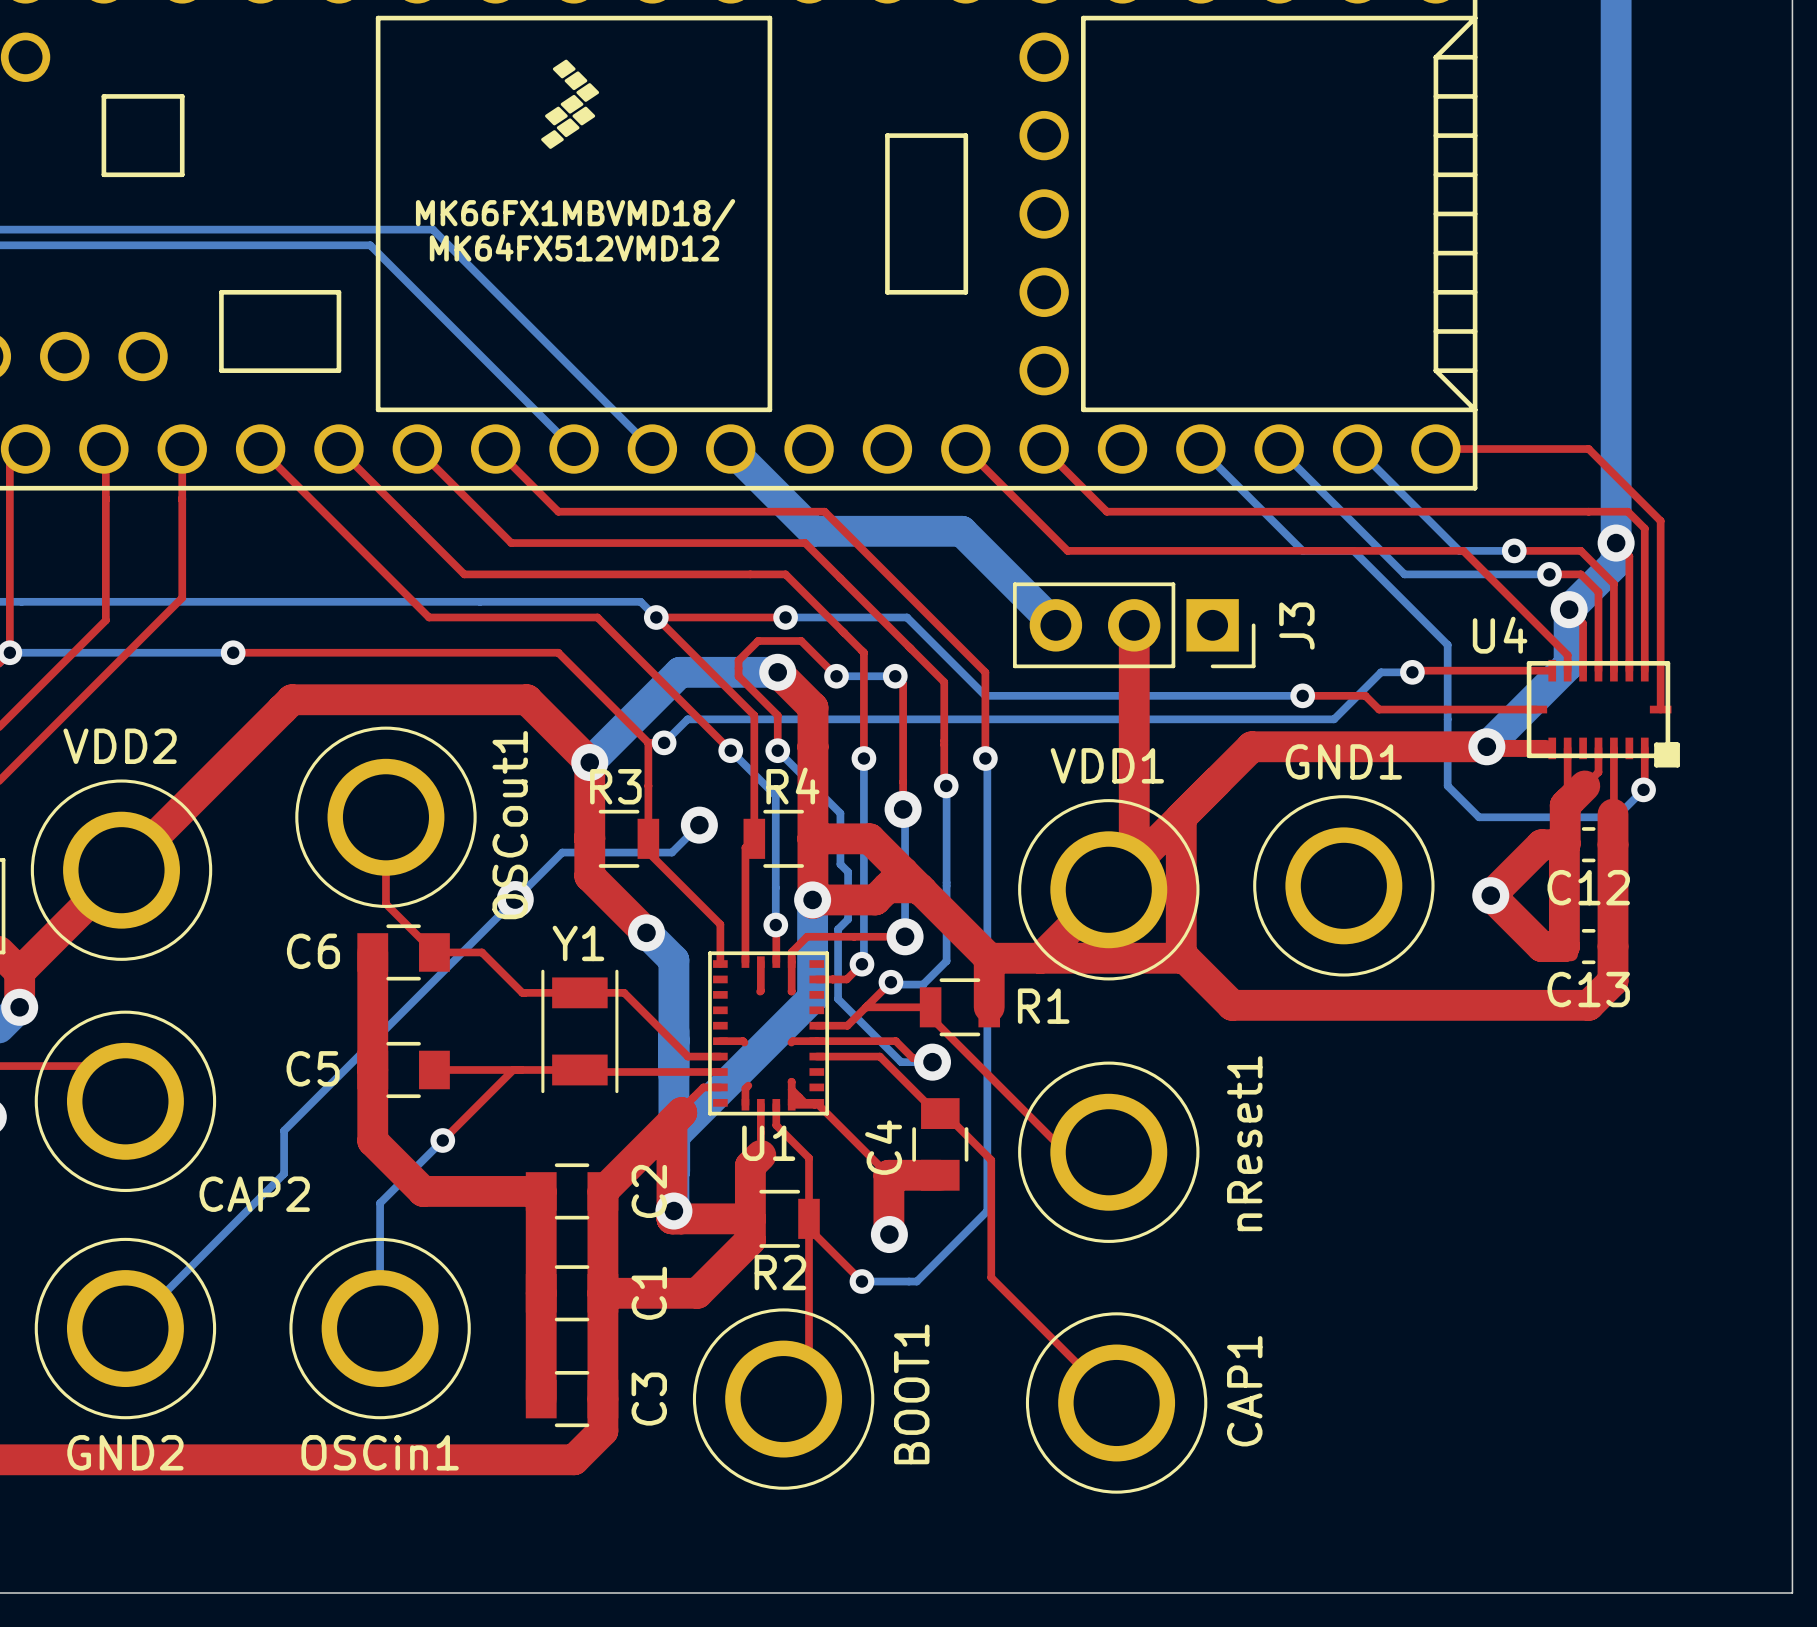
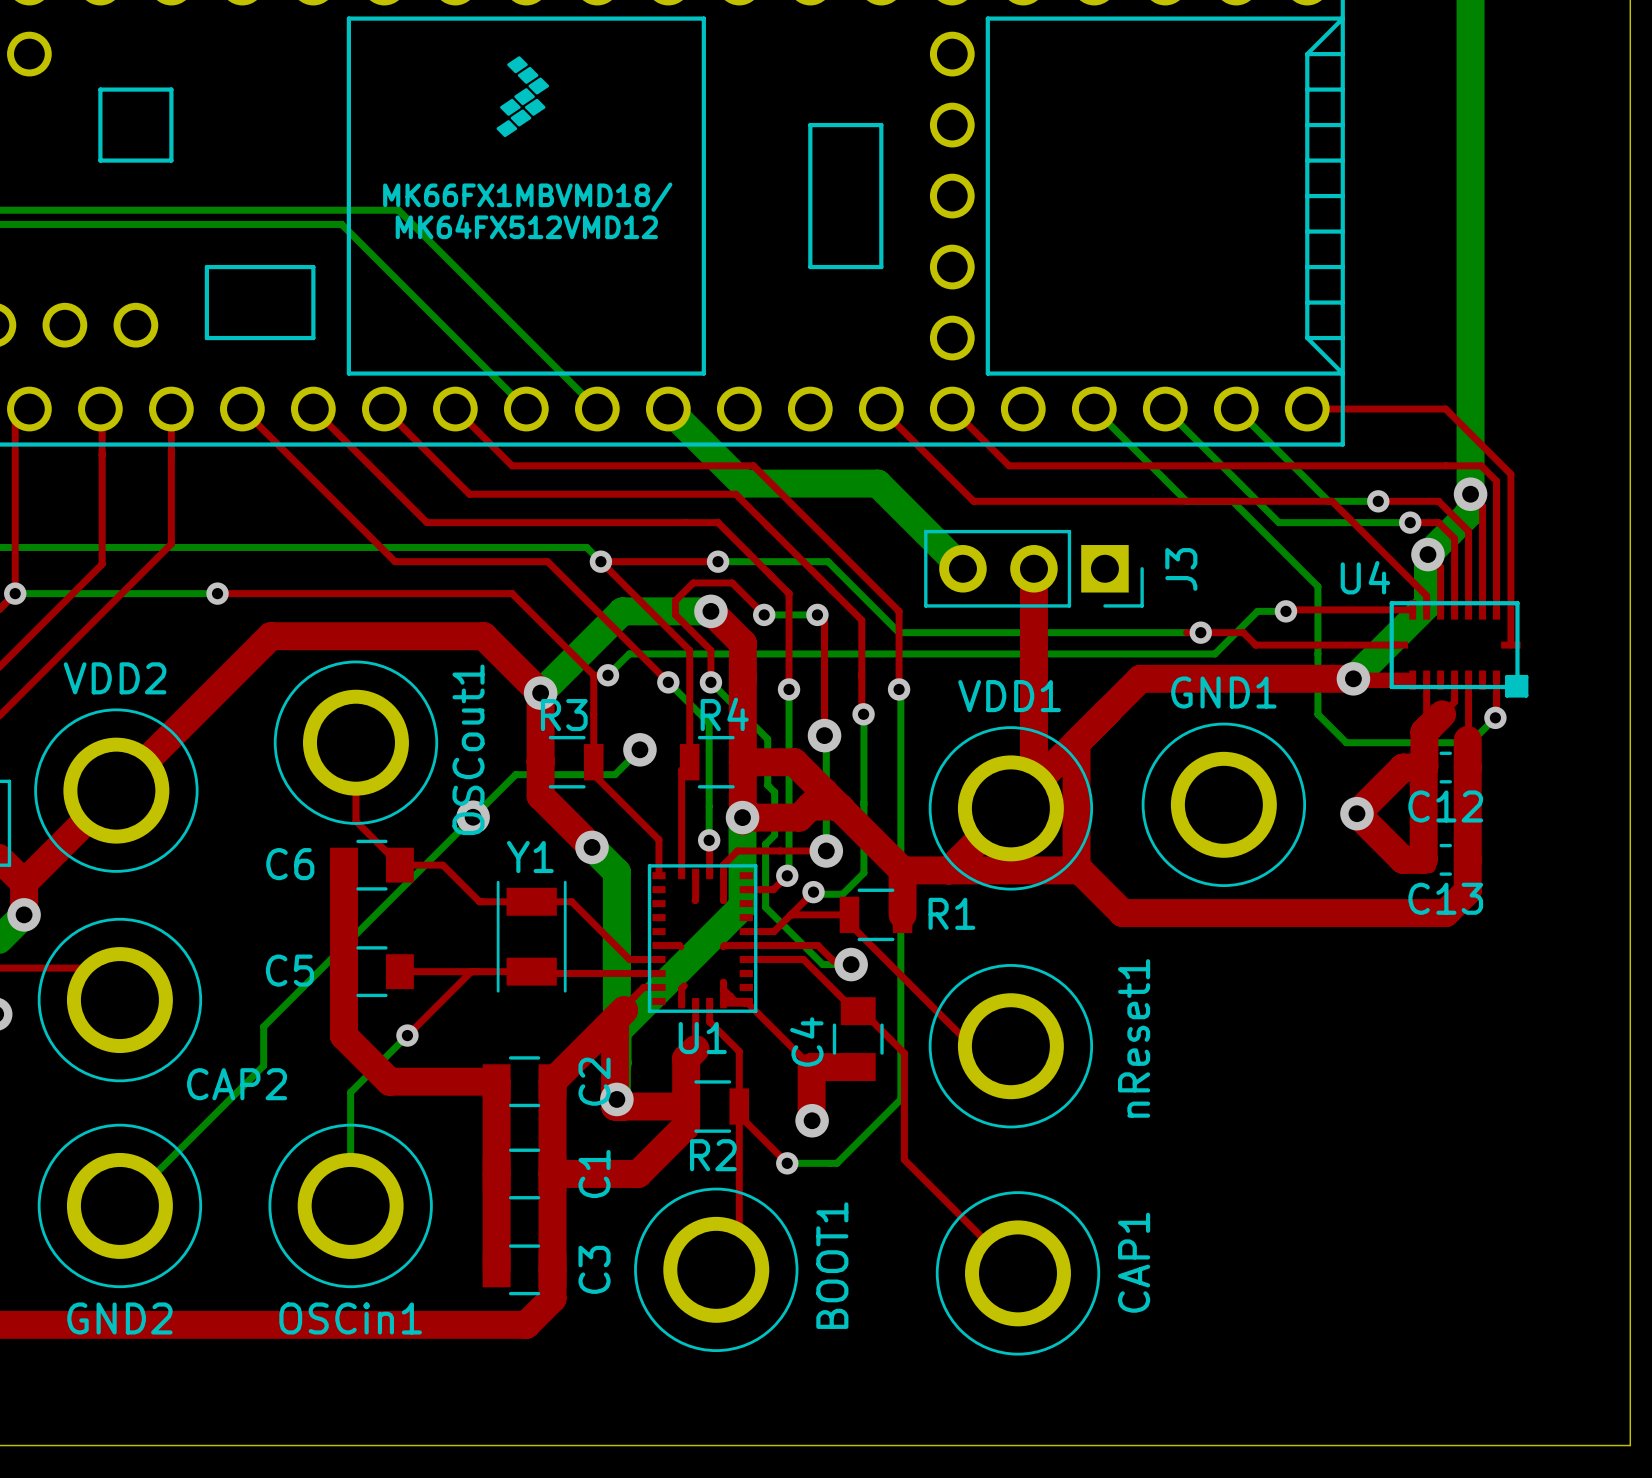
via position: (1302, 695) -> (1200, 632)

